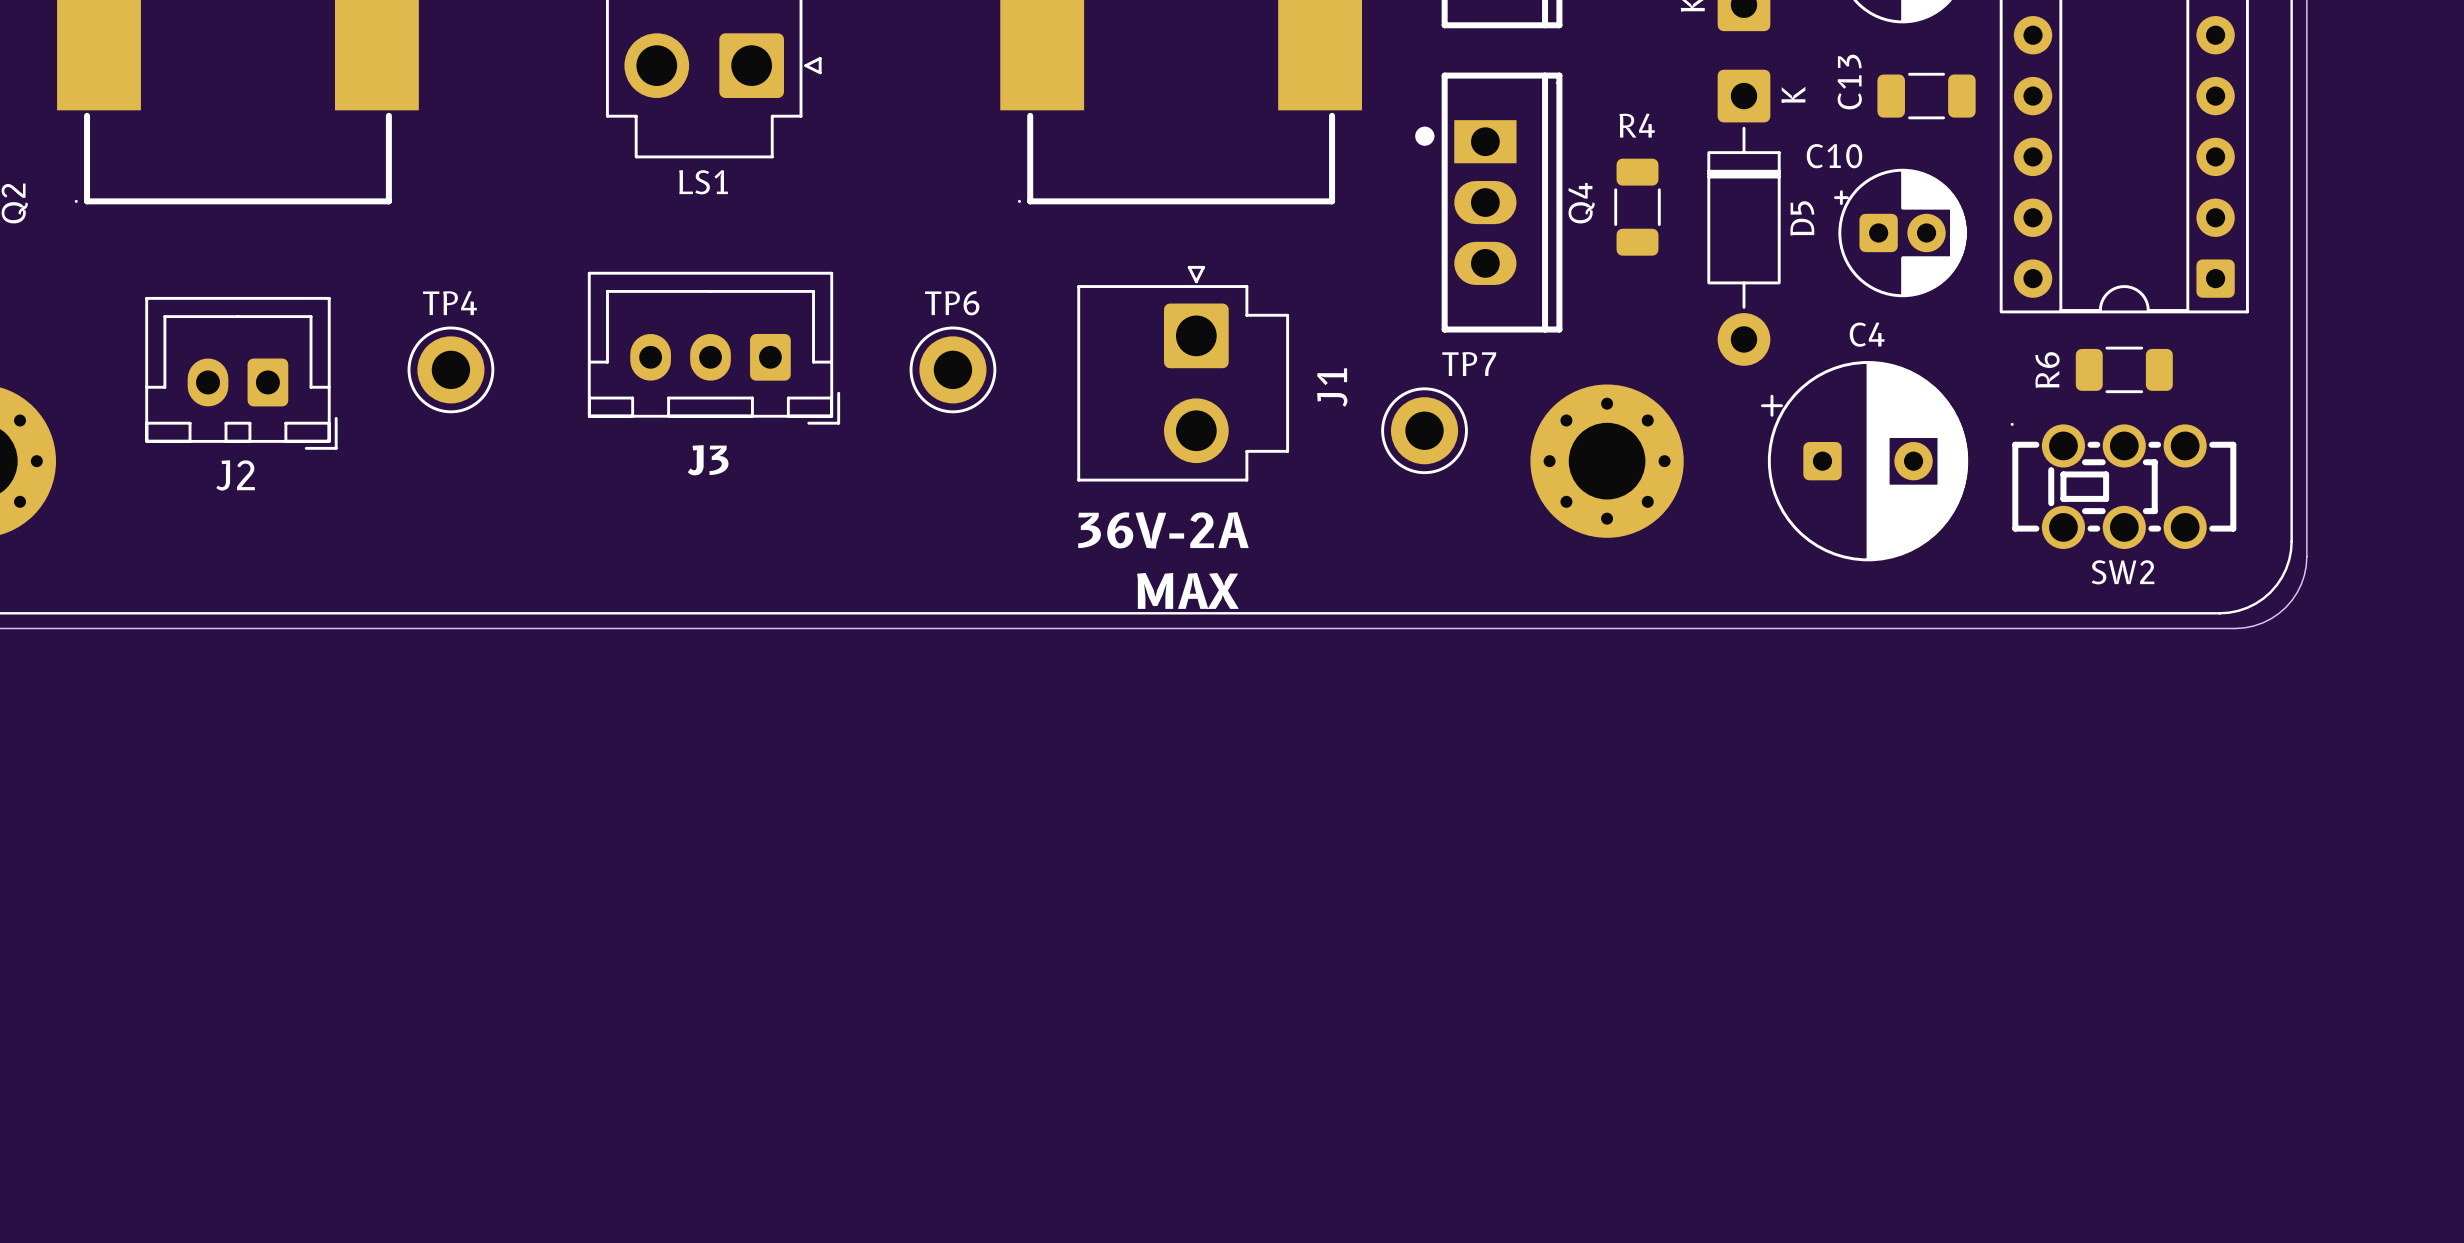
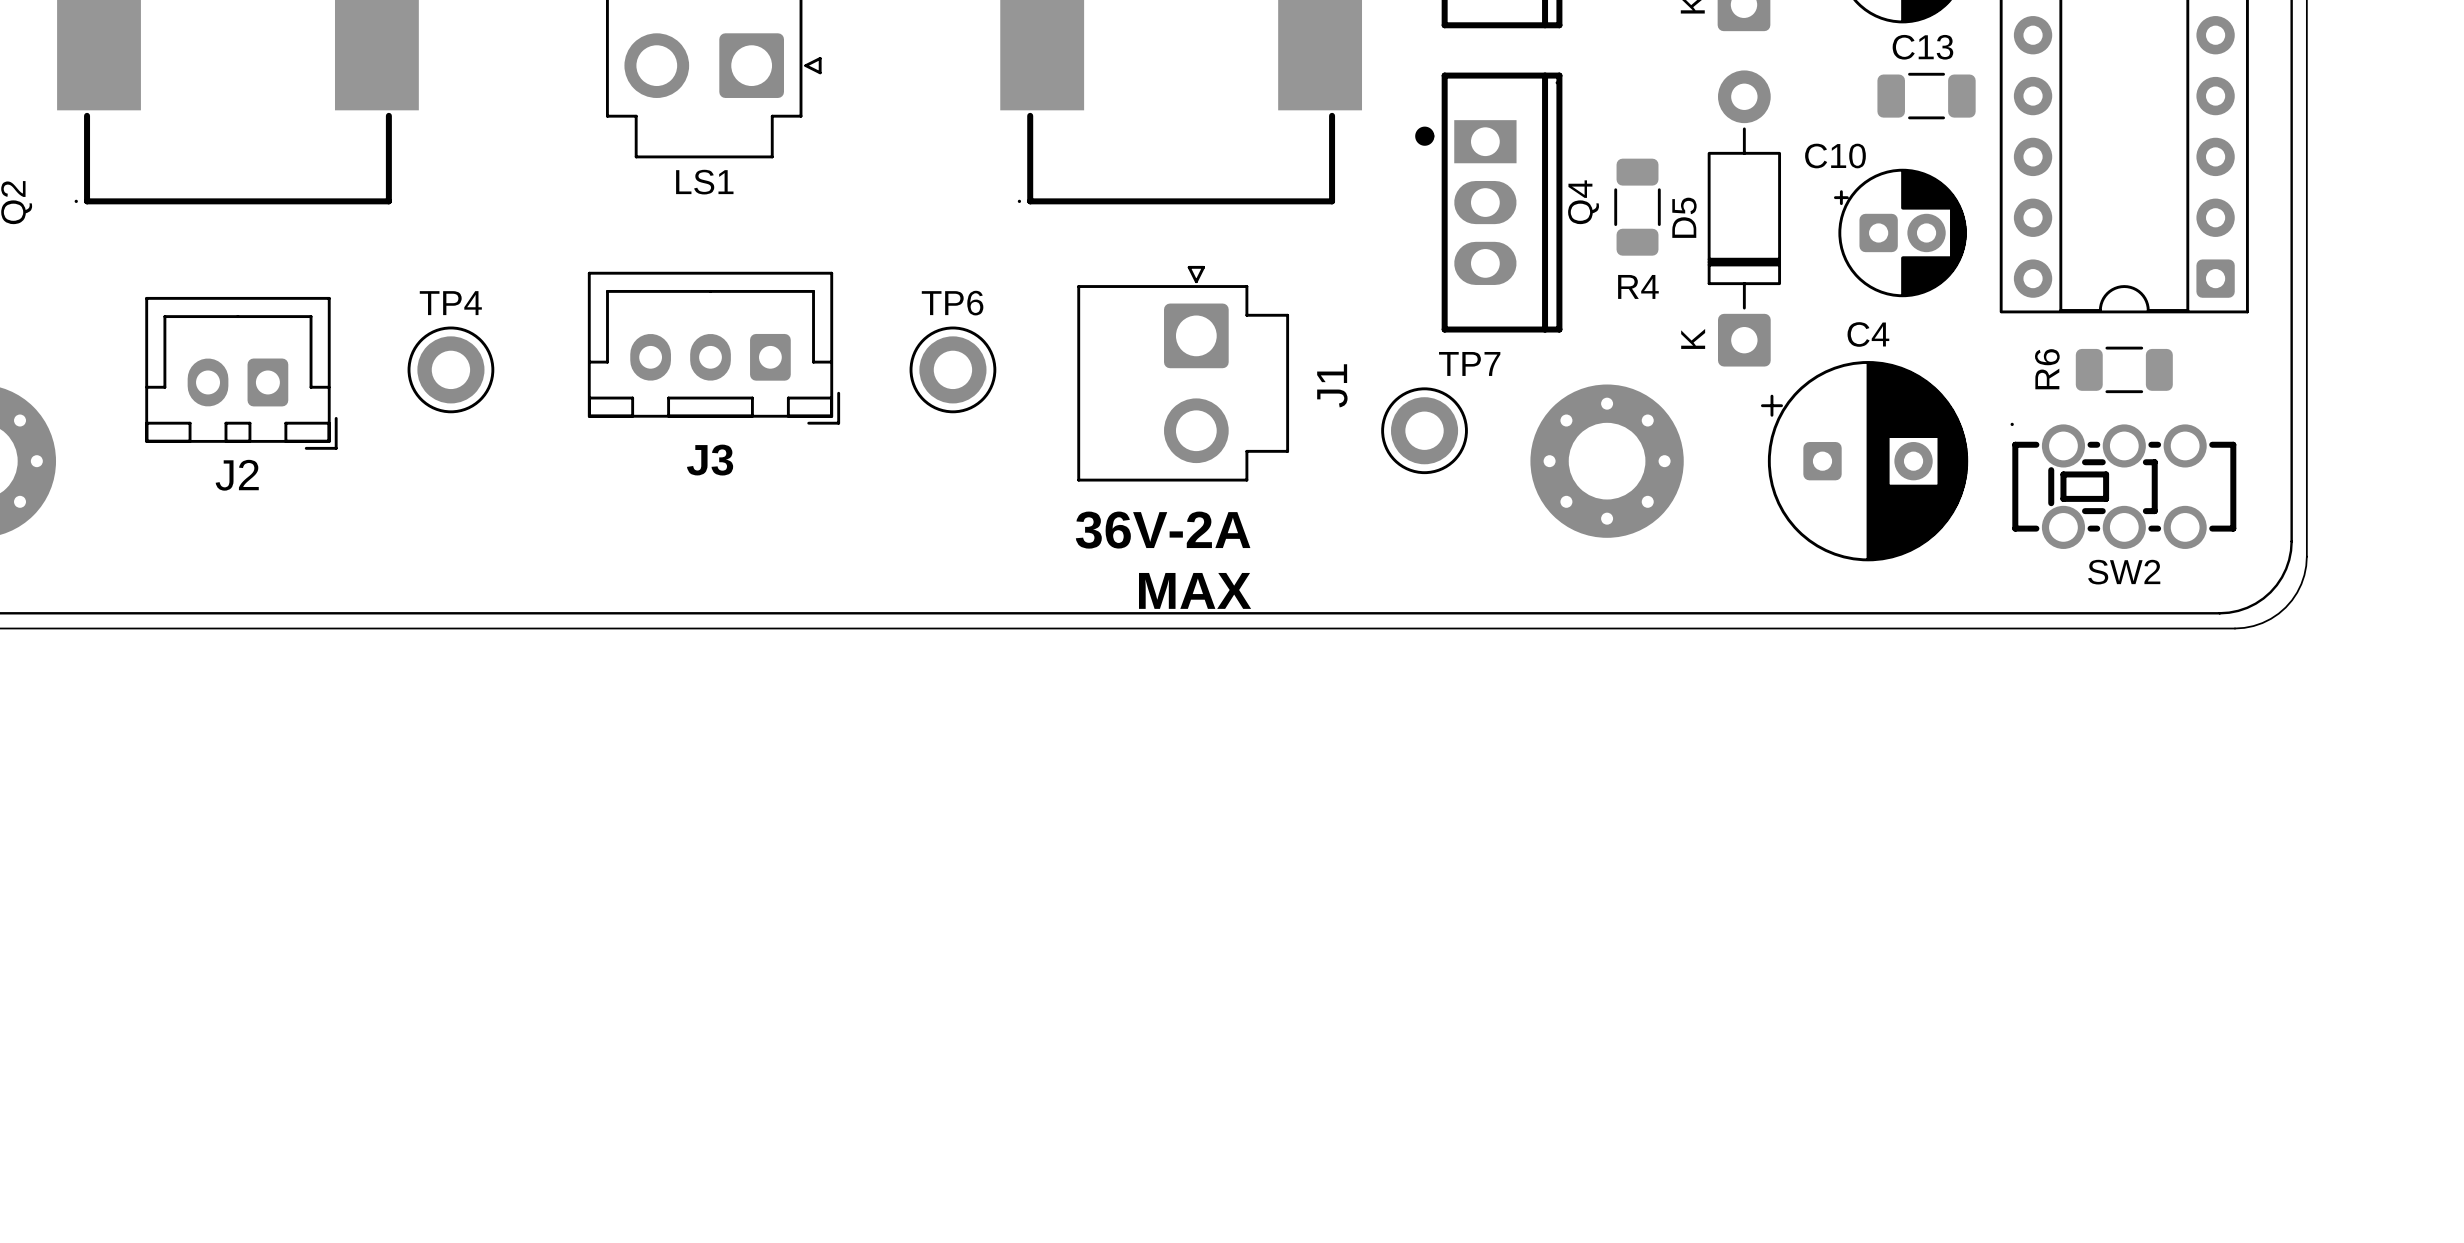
C13 name rotation: 0° (1849, 82) -> 90° clockwise (1922, 47)
R4 name position: R4 (1637, 125) -> R4 (1638, 286)
D5 rotation: 0° (1744, 217) -> 180° (1744, 218)

